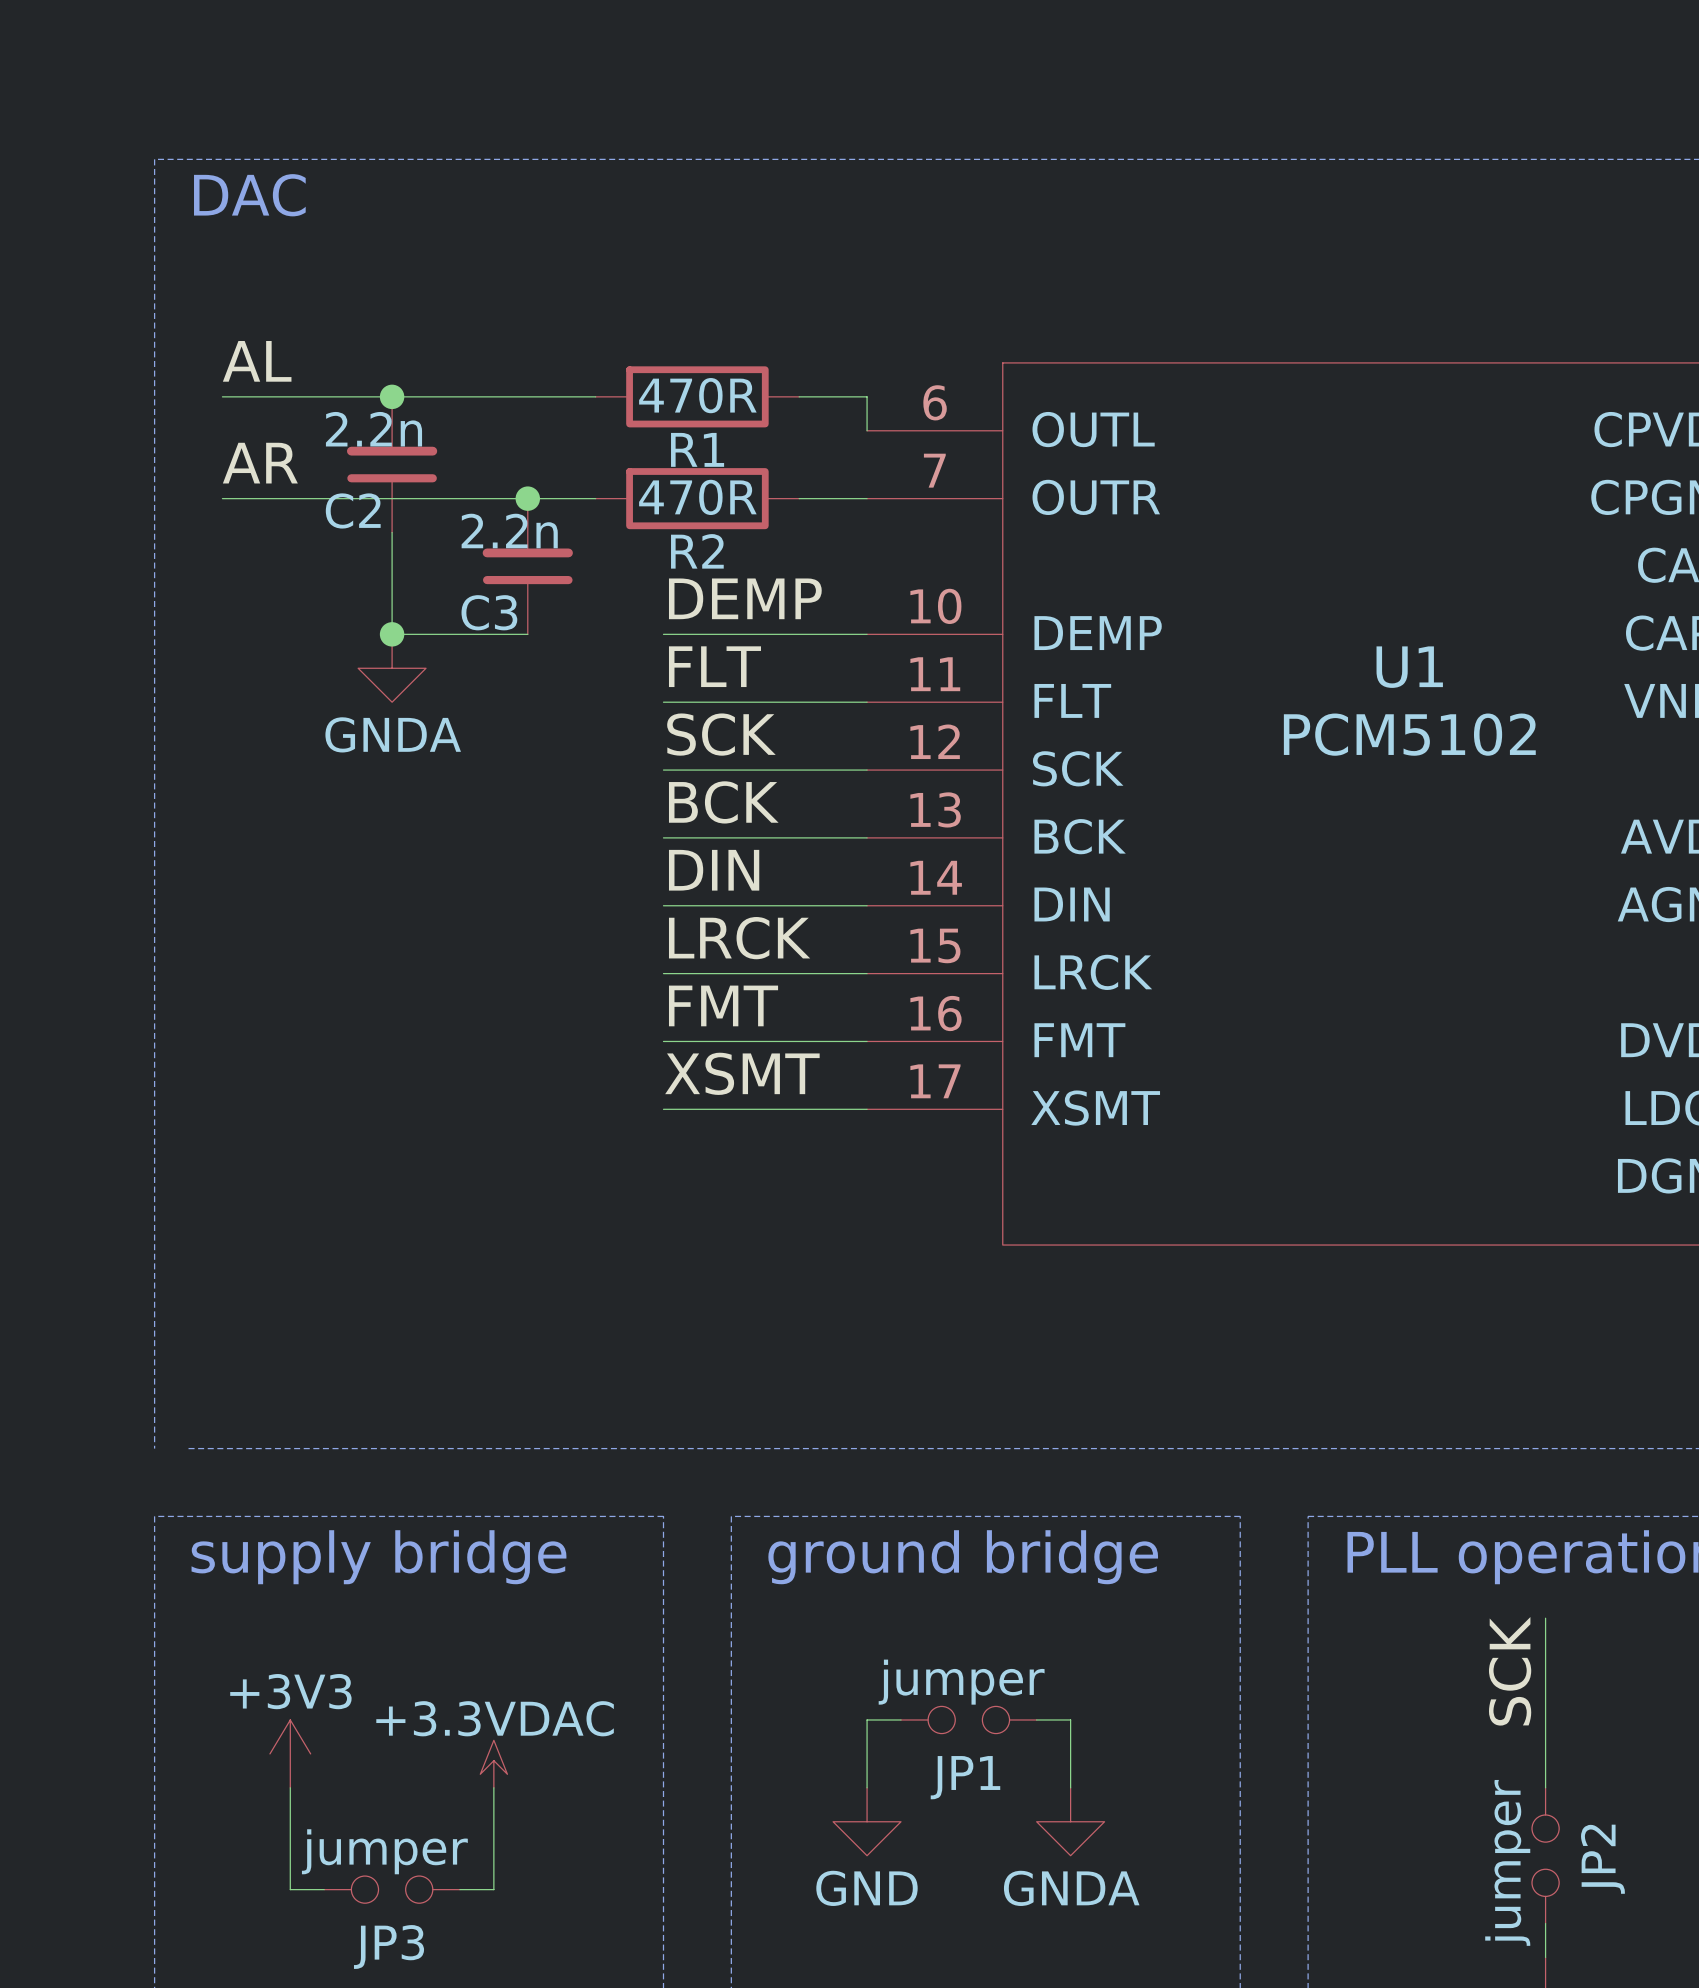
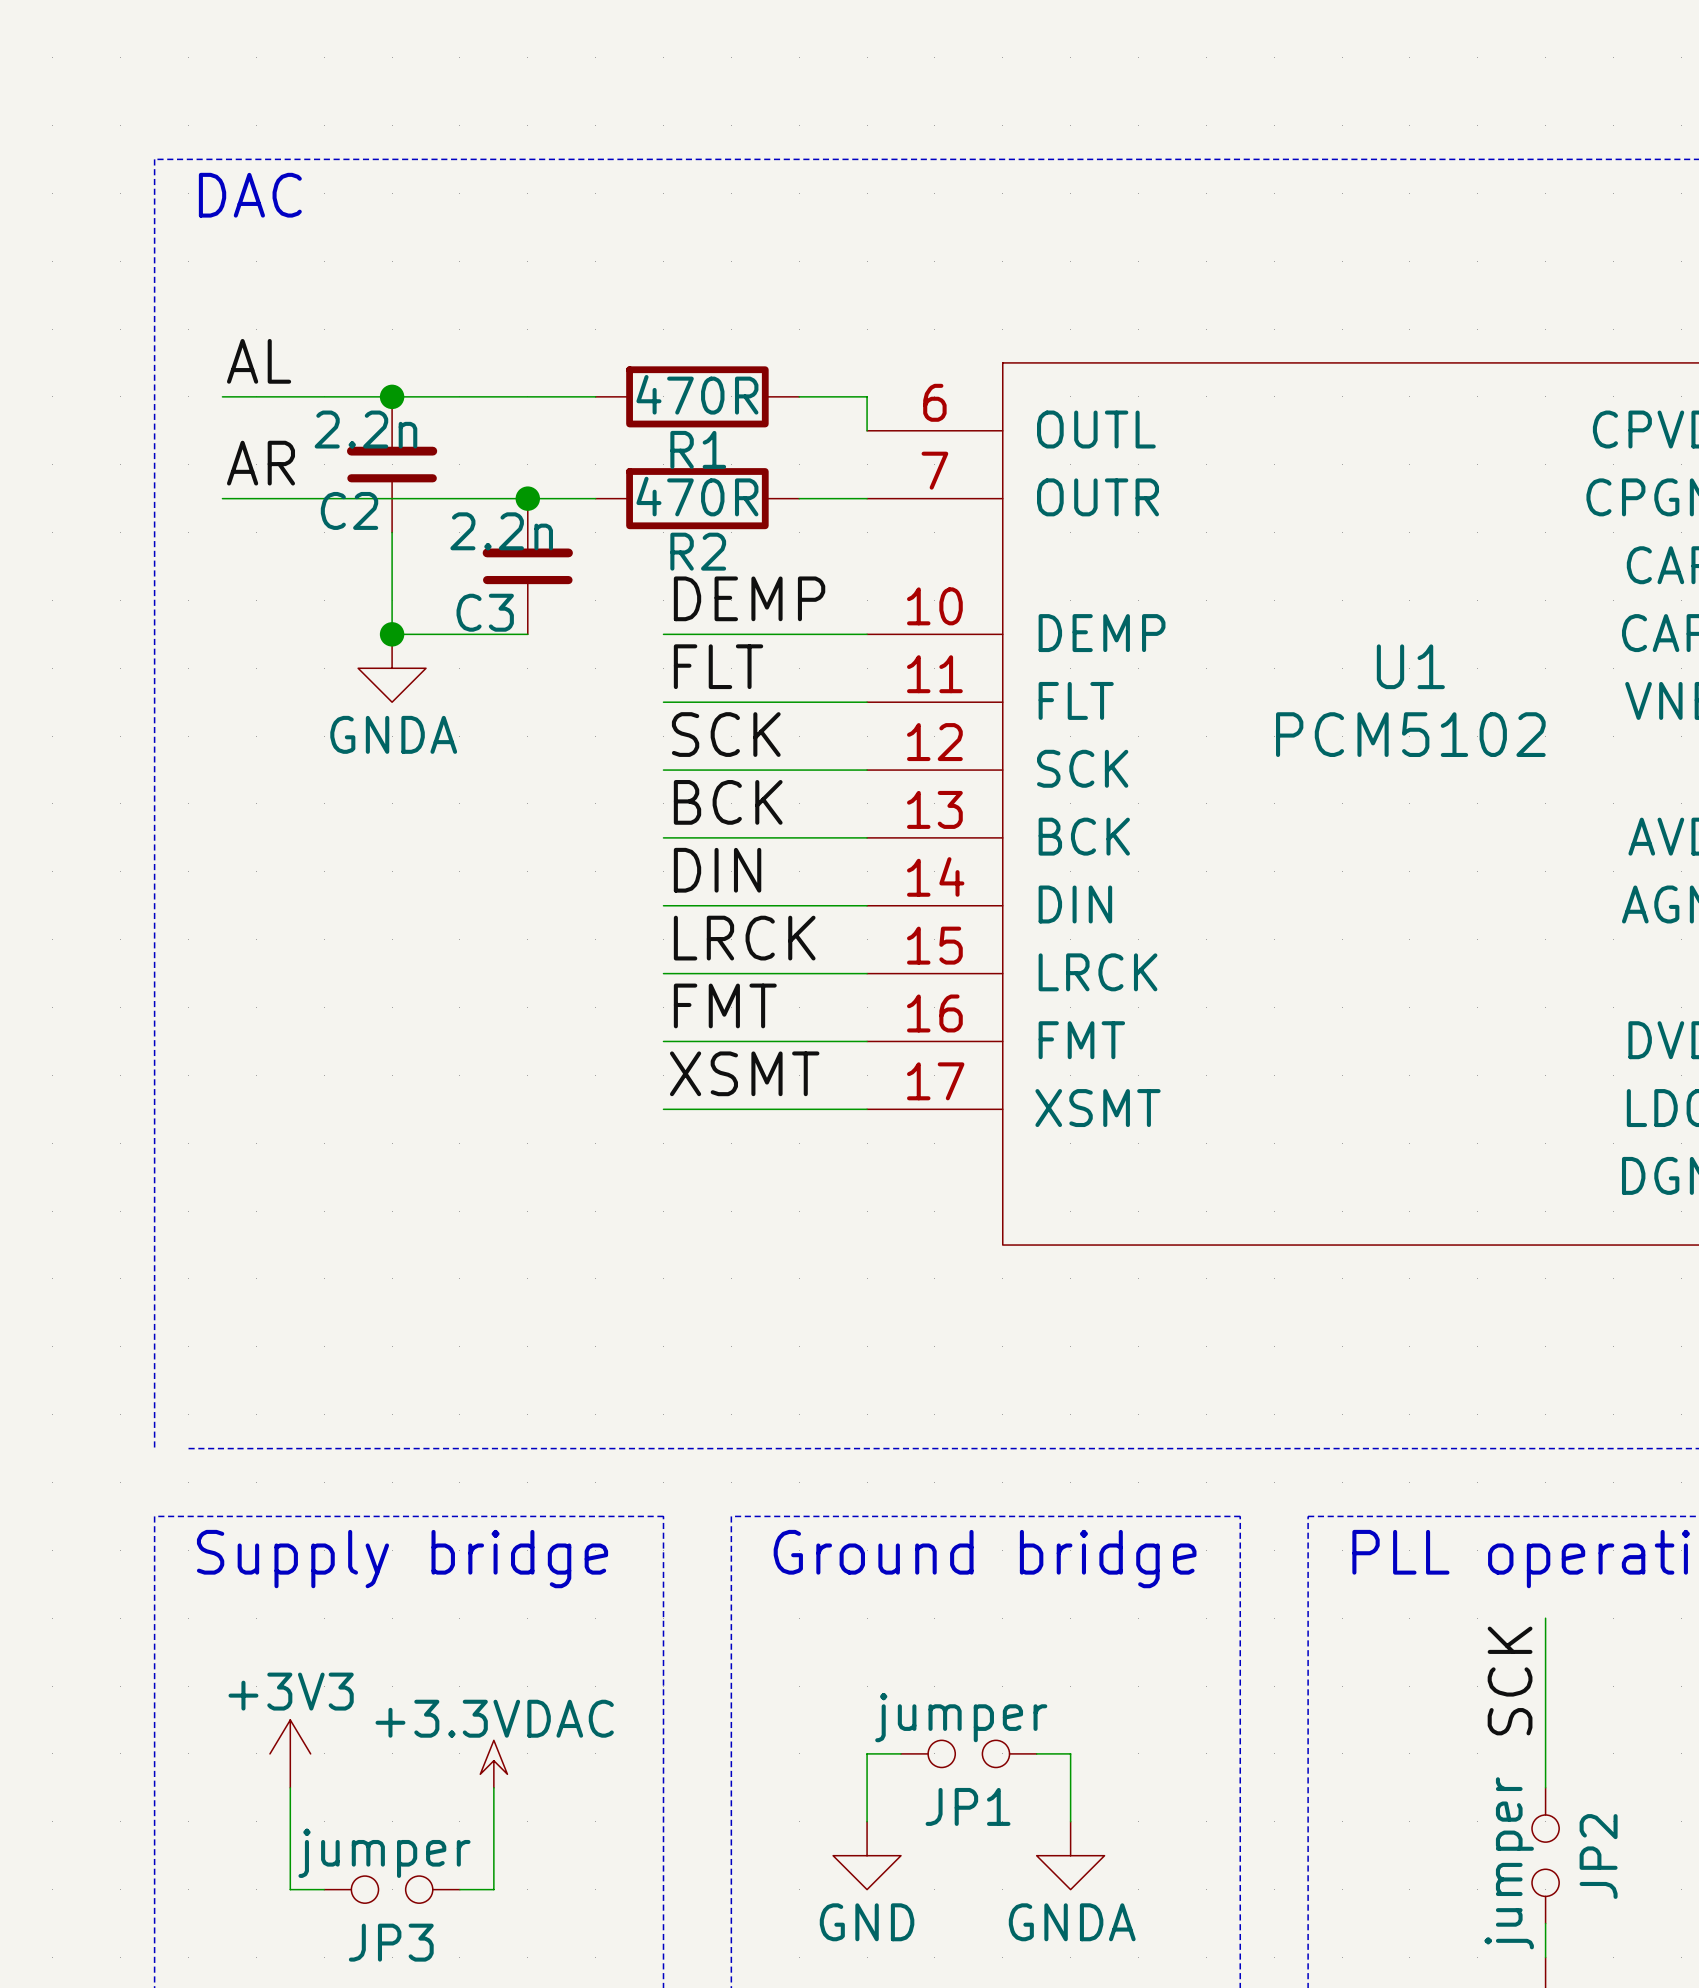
text: supply bridge (378, 1557) -> Supply bridge (402, 1559)
text: ground bridge (963, 1557) -> Ground bridge (985, 1559)
wire: (900, 1719) (867, 1719) (867, 1753) -> (900, 1753) (867, 1753)
JP1 position: (968, 1719) -> (968, 1753)
wire: (1036, 1719) (1070, 1719) (1070, 1753) -> (1036, 1753) (1070, 1753)
power symbol position: GND (867, 1821) -> GND (867, 1855)
power symbol position: GNDA (1070, 1821) -> GNDA (1070, 1855)

